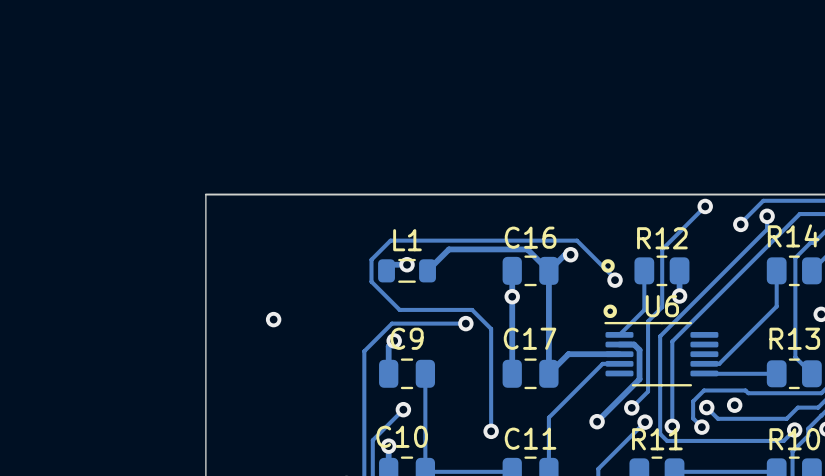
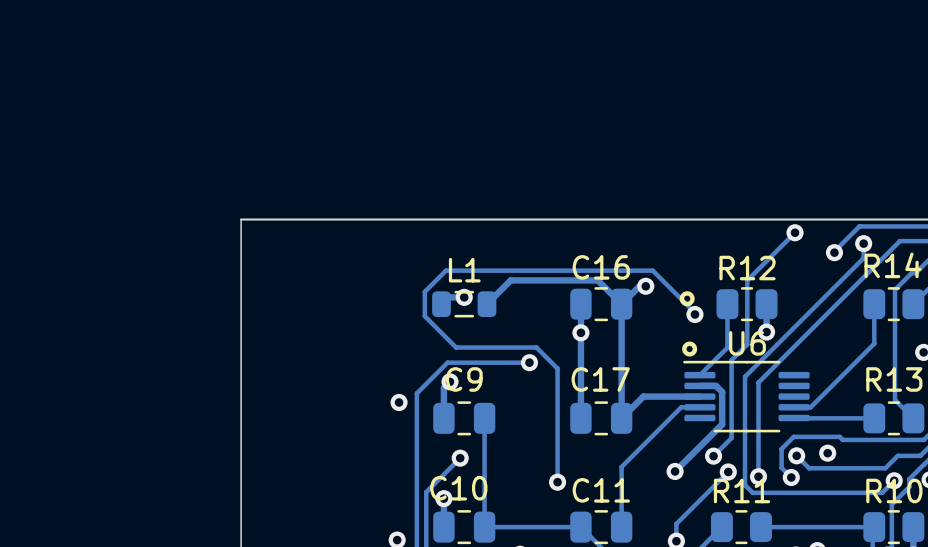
via position: (273, 319) -> (399, 402)

